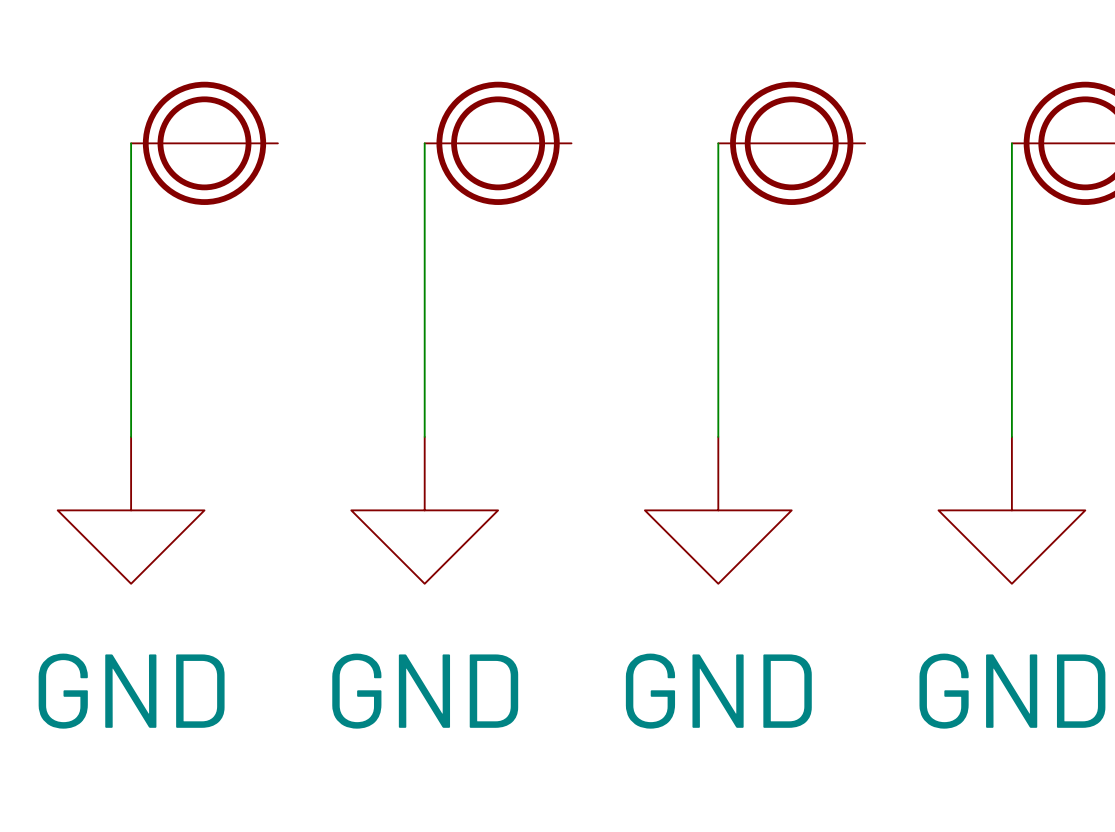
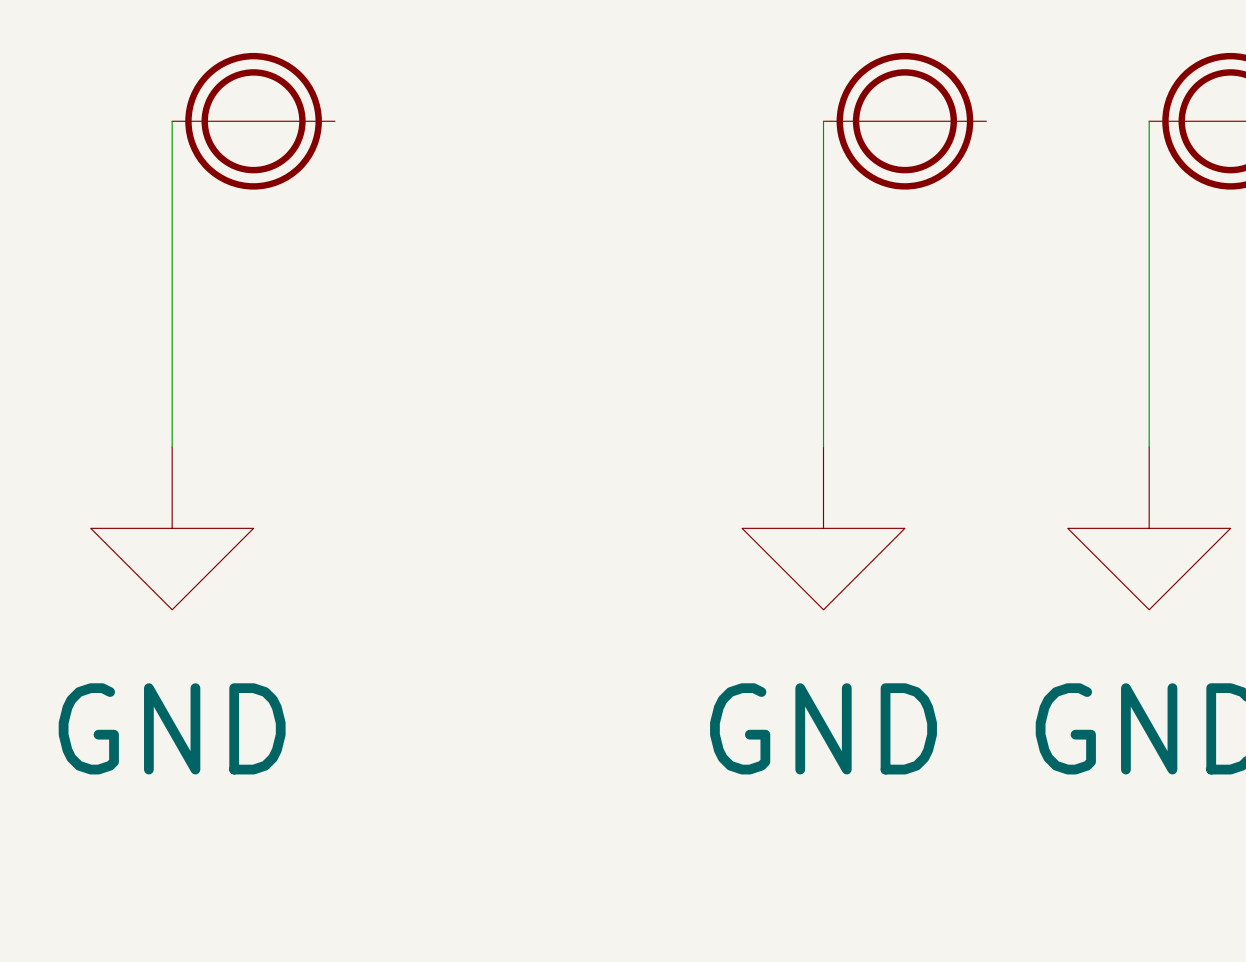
wire: (424, 143) (424, 436) -> none
part: (498, 143) -> none
power symbol: GND (424, 510) -> none

